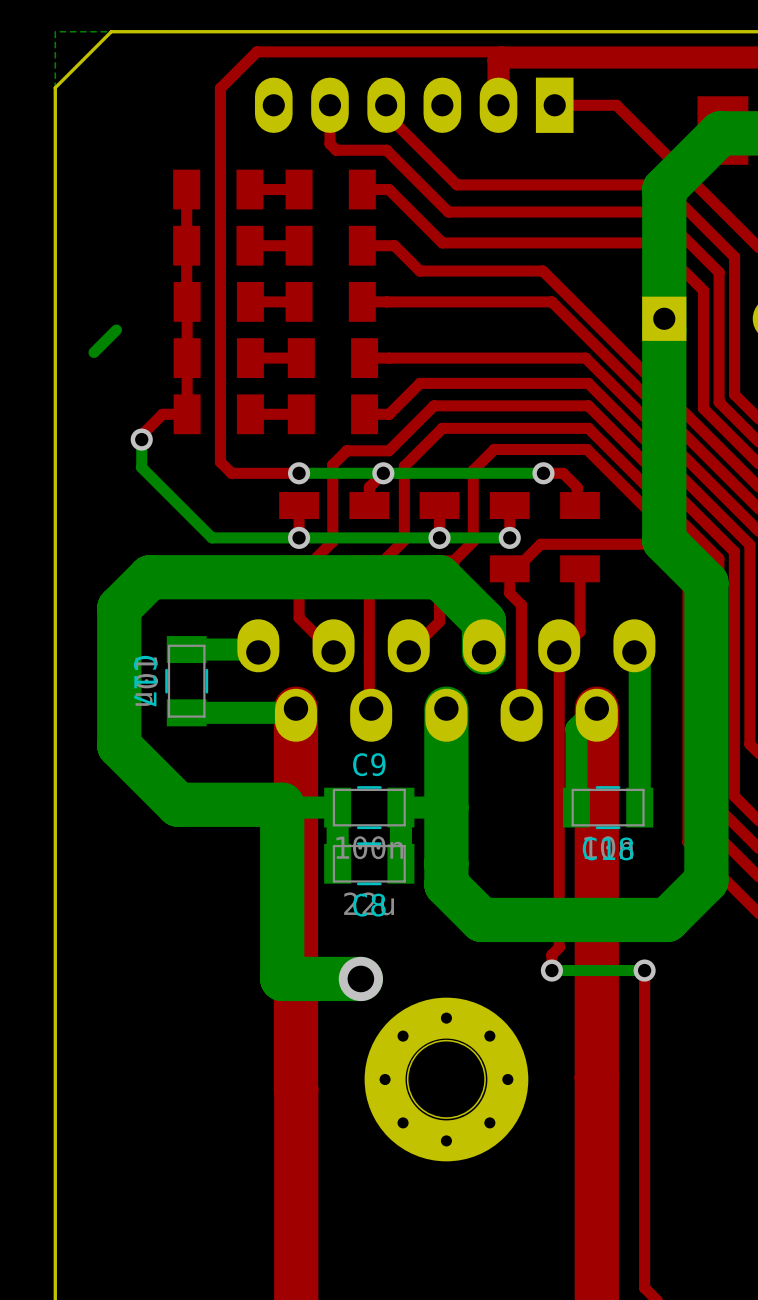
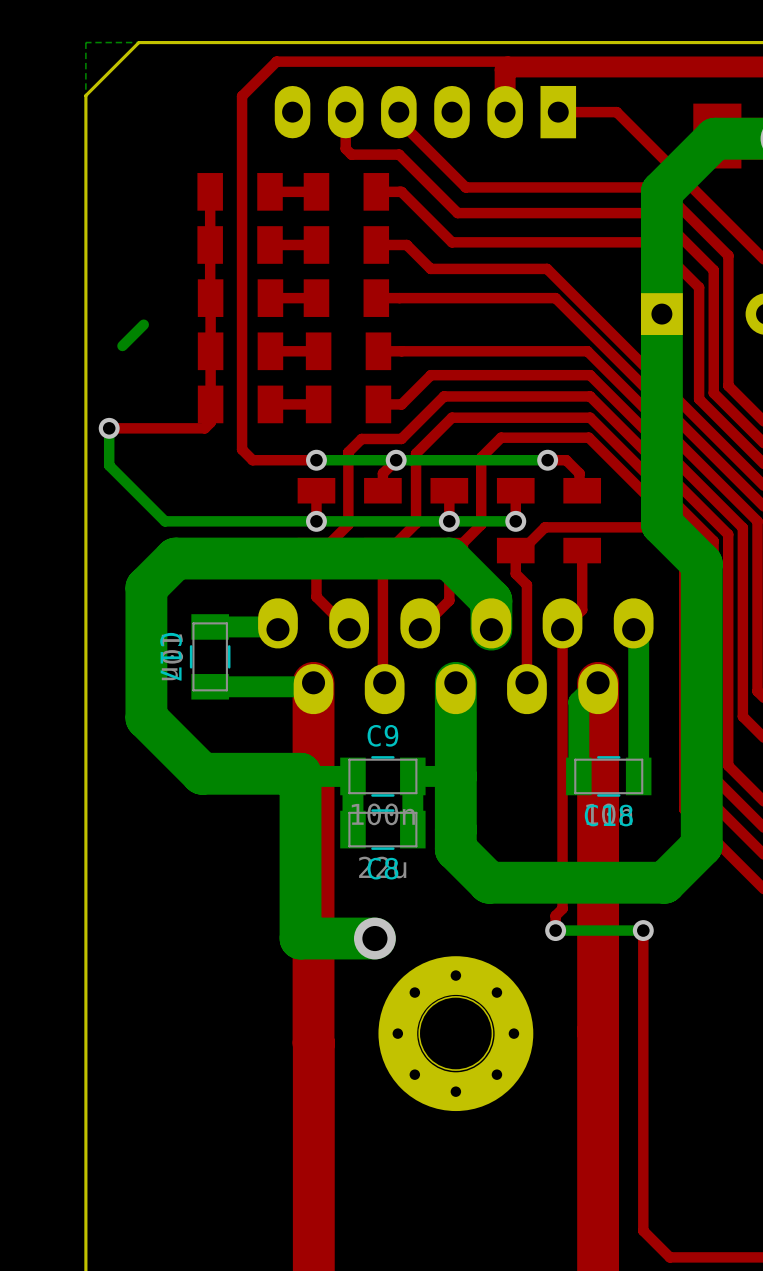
top track: (187, 414) (162, 414) (141, 435) (141, 439) -> (210, 404) (210, 422) (204, 428) (109, 428)
bottom track: (141, 439) (141, 467) (211, 537) -> (109, 428) (109, 465) (165, 521) (234, 521)
via position: (141, 439) -> (109, 428)

